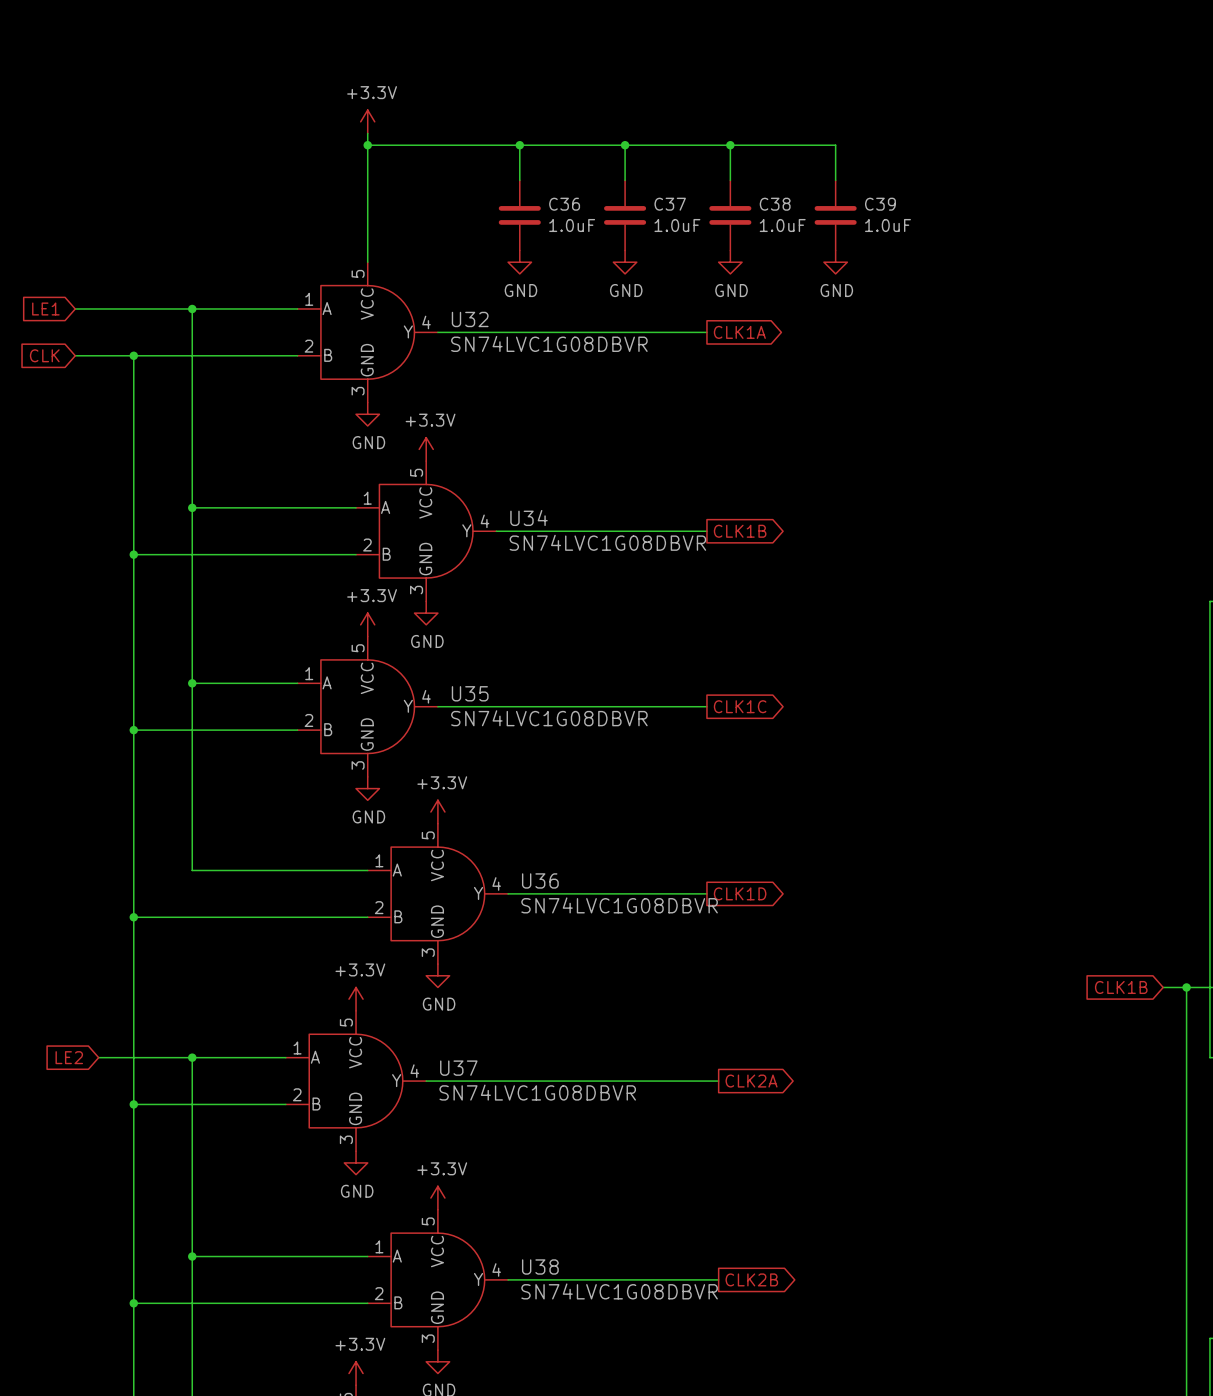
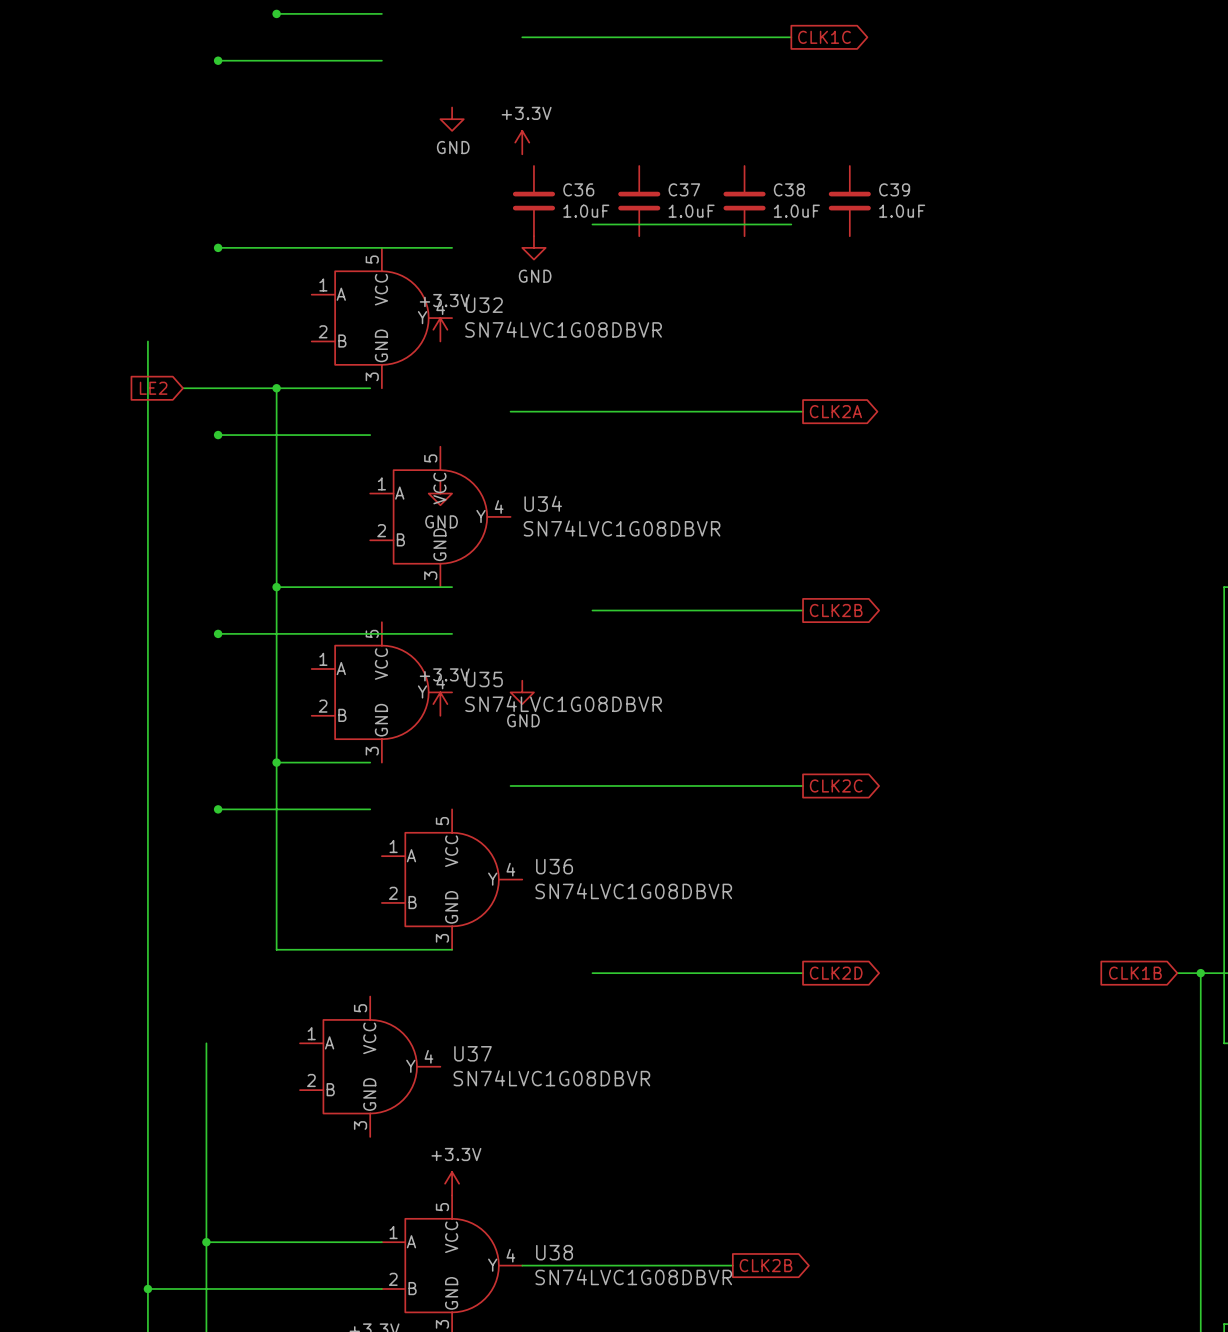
wire: none -> (276, 13) (381, 13)
junction: none -> (276, 13)
wire: none -> (522, 37) (791, 37)
global label: none -> CLK1C (824, 37)
wire: none -> (218, 60) (381, 60)
junction: none -> (218, 60)
power symbol: +3.3V (367, 121) -> none
wire: (367, 133) (367, 262) -> none
power symbol: none -> GND (452, 119)
wire: (367, 145) (835, 145) (835, 180) -> none
junction: (367, 145) -> none
wire: (519, 145) (519, 180) -> none
junction: (519, 145) -> none
wire: (625, 145) (625, 180) -> none
junction: (625, 145) -> none
wire: (730, 145) (730, 180) -> none
junction: (730, 145) -> none
power symbol: none -> +3.3V (522, 142)
wire: none -> (592, 224) (791, 224)
wire: none -> (218, 247) (452, 247)
power symbol: GND (625, 262) -> none
power symbol: GND (730, 262) -> none
power symbol: GND (835, 262) -> none
global label: LE1 (45, 308) -> none
wire: (75, 308) (297, 308) -> none
wire: (192, 308) (192, 870) (367, 870) -> (276, 388) (276, 949) (452, 949)
junction position: (192, 308) -> (218, 247)
wire: (437, 332) (706, 332) -> none
global label: CLK1A (739, 332) -> none
global label: CLK (44, 355) -> none
wire: (75, 355) (297, 355) -> none
junction: (133, 355) -> none
global label: none -> LE2 (153, 388)
wire: none -> (183, 388) (370, 388)
junction: none -> (276, 388)
power symbol: GND (367, 414) -> none
wire: none -> (510, 411) (803, 411)
global label: none -> CLK2A (835, 411)
wire: none -> (218, 435) (370, 435)
junction: none -> (218, 435)
power symbol position: +3.3V (426, 449) -> +3.3V (440, 329)
wire: (192, 507) (356, 507) -> none
junction: (192, 507) -> none
power symbol: none -> GND (440, 493)
wire: (496, 531) (706, 531) -> (592, 610) (803, 610)
global label: CLK1B (740, 531) -> none
wire: (133, 554) (356, 554) -> none
junction: (133, 554) -> none
wire: none -> (276, 587) (452, 587)
junction: none -> (276, 587)
power symbol: GND (426, 613) -> none
power symbol: +3.3V (367, 624) -> none
global label: none -> CLK2B (836, 610)
wire: none -> (218, 633) (452, 633)
wire: (192, 683) (297, 683) -> none
junction position: (192, 683) -> (218, 633)
wire: (437, 706) (706, 706) -> none
power symbol: none -> GND (522, 692)
global label: CLK1C (740, 706) -> none
power symbol: none -> +3.3V (440, 704)
wire: (133, 730) (297, 730) -> none
junction: (133, 730) -> none
wire: none -> (276, 762) (370, 762)
junction: none -> (276, 762)
power symbol: GND (367, 788) -> none
wire: none -> (510, 785) (803, 785)
global label: none -> CLK2C (836, 785)
power symbol: +3.3V (437, 812) -> none
wire: none -> (218, 809) (370, 809)
junction: none -> (218, 809)
wire: (508, 893) (706, 893) -> none
global label: CLK1D (740, 893) -> none
wire: (133, 917) (367, 917) -> none
junction: (133, 917) -> none
power symbol: GND (437, 975) -> none
wire: none -> (592, 973) (803, 973)
global label: none -> CLK2D (836, 973)
power symbol: +3.3V (356, 999) -> none
global label: LE2 (69, 1057) -> none
wire: (98, 1057) (285, 1057) -> none
junction: (192, 1057) -> none
wire: (426, 1081) (718, 1081) -> none
global label: CLK2A (751, 1081) -> none
wire: (133, 1104) (285, 1104) -> none
junction: (133, 1104) -> none
power symbol: GND (356, 1162) -> none

